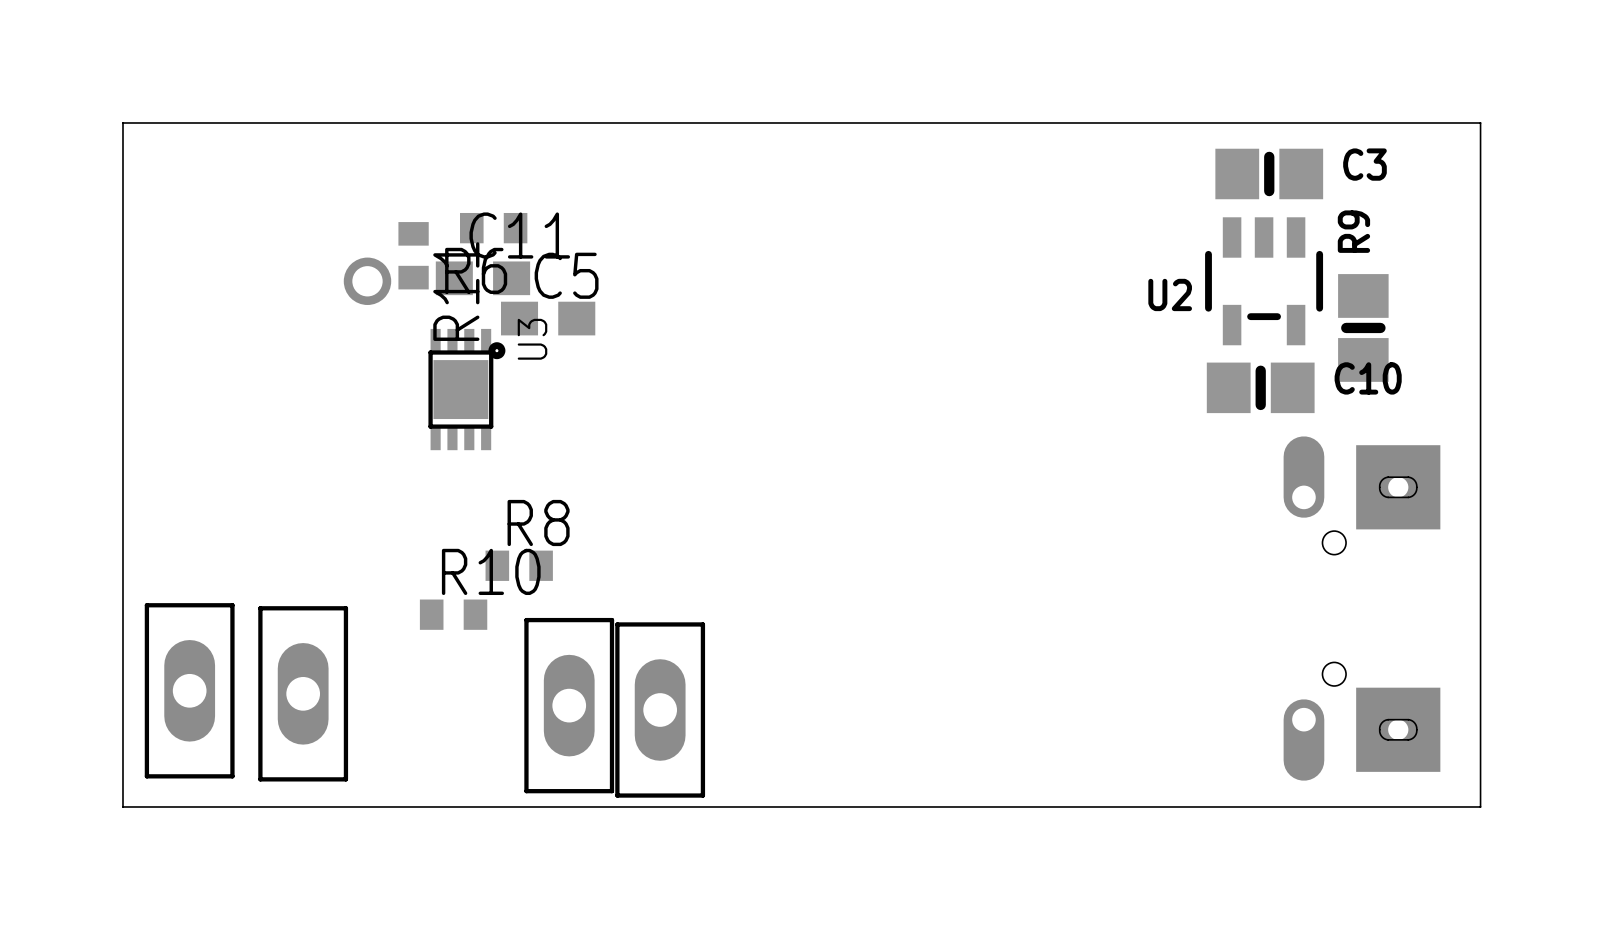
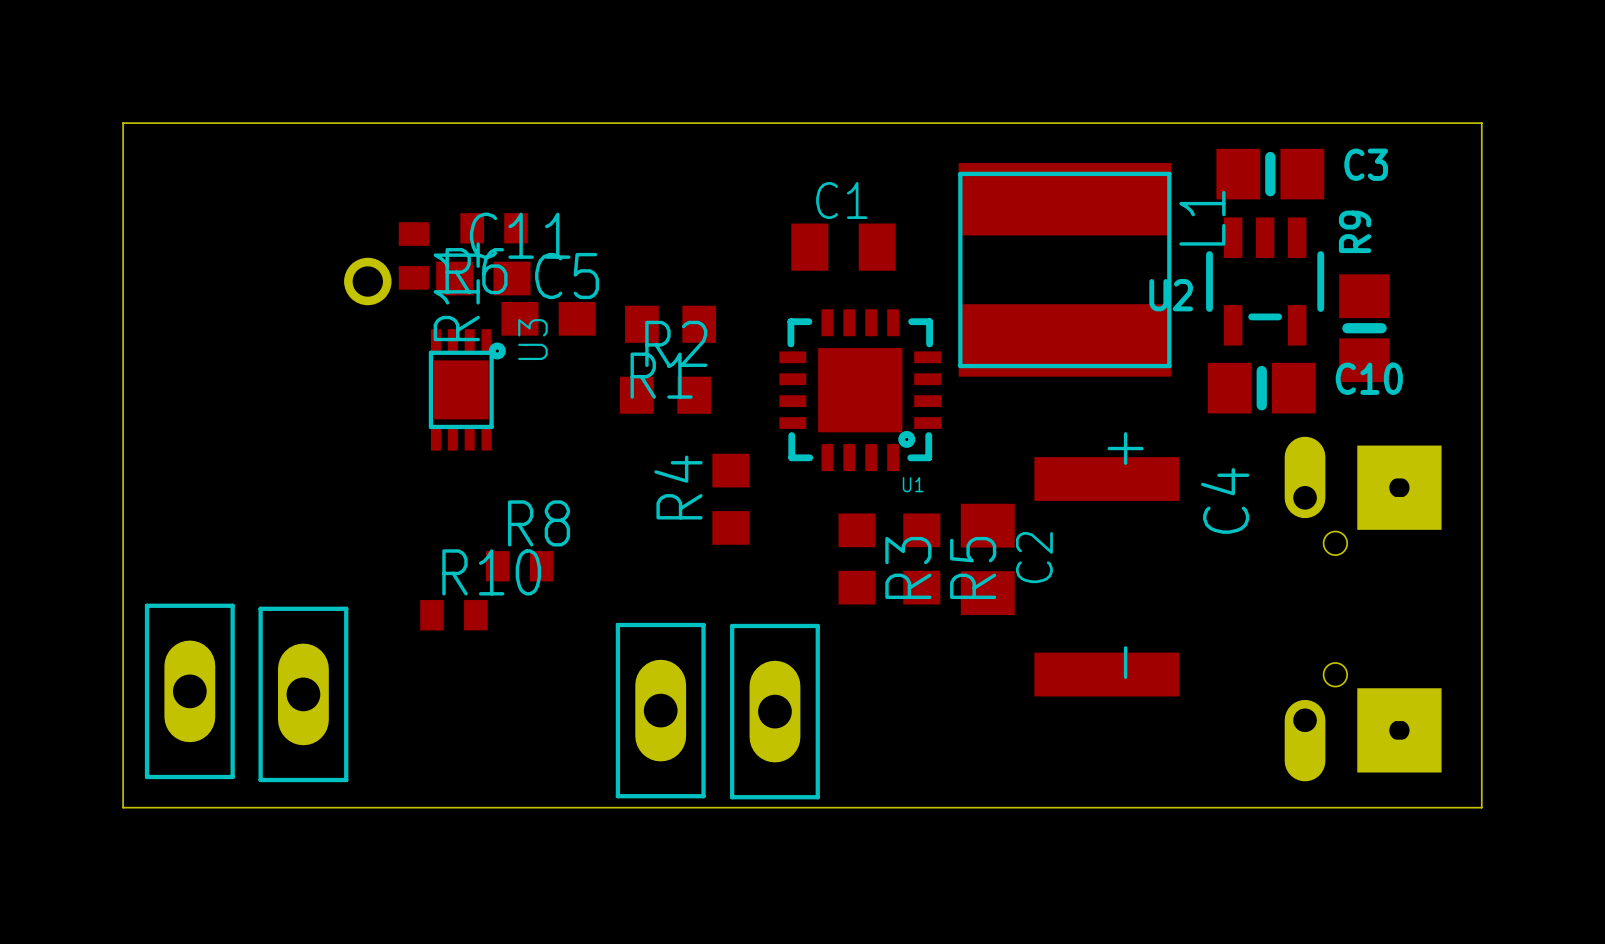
C1: none -> (843, 247)
L1: none -> (1064, 269)
R1: none -> (670, 324)
U1: none -> (860, 390)
R2: none -> (665, 395)
R4: none -> (730, 499)
R3: none -> (857, 558)
R5: none -> (921, 558)
C2: none -> (987, 559)
C4: none -> (1106, 576)
part position: (569, 705) -> (774, 711)

